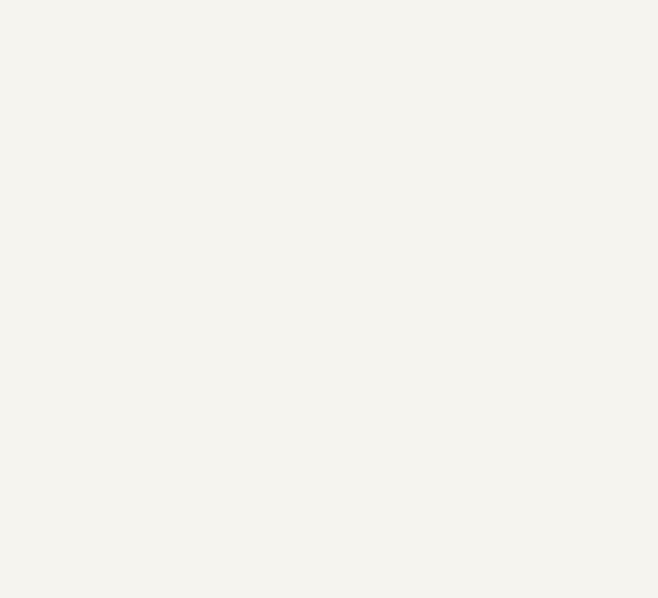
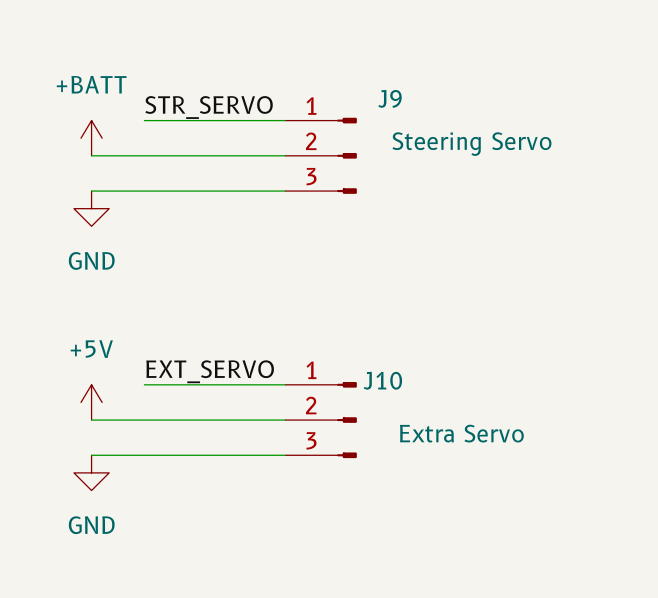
label: none -> STR_SERVO (209, 107)
wire: none -> (144, 120) (285, 120)
power symbol: none -> +BATT (91, 138)
wire: none -> (91, 155) (285, 155)
J9: none -> Steering Servo (321, 155)
wire: none -> (91, 191) (285, 191)
power symbol: none -> GND (91, 208)
label: none -> EXT_SERVO (210, 371)
wire: none -> (144, 384) (285, 384)
power symbol: none -> +5V (91, 402)
wire: none -> (91, 420) (285, 420)
J10: none -> Extra Servo (321, 420)
wire: none -> (91, 455) (285, 455)
power symbol: none -> GND (91, 472)

